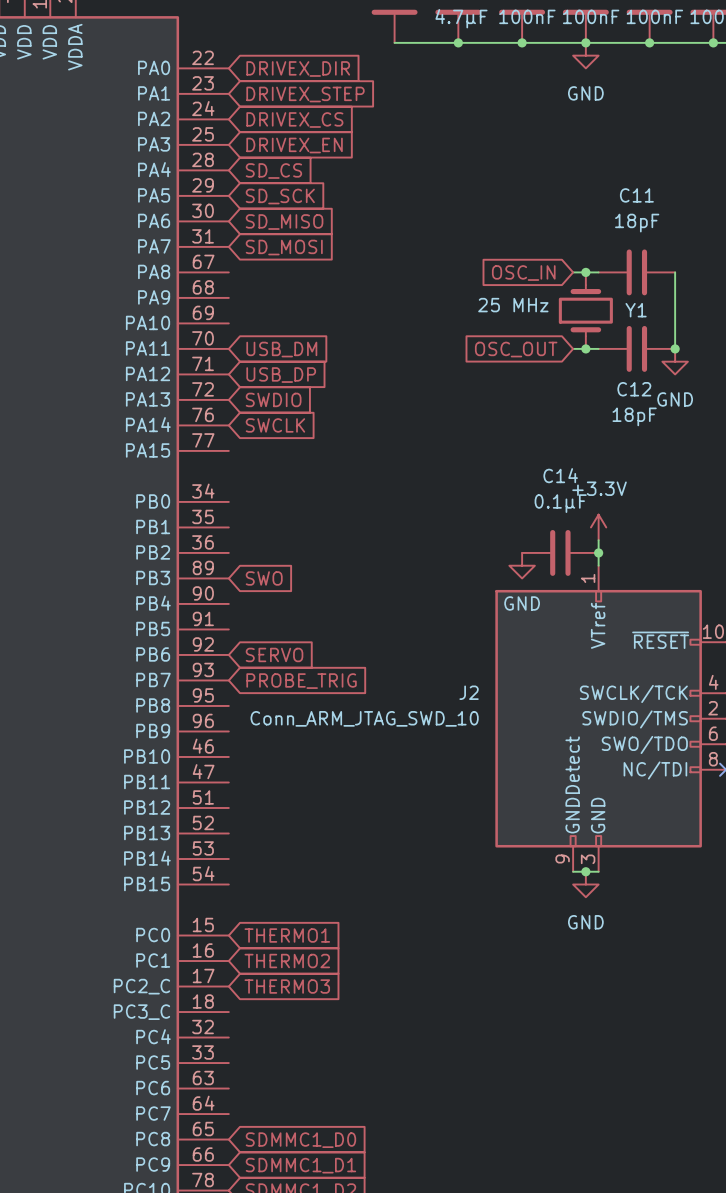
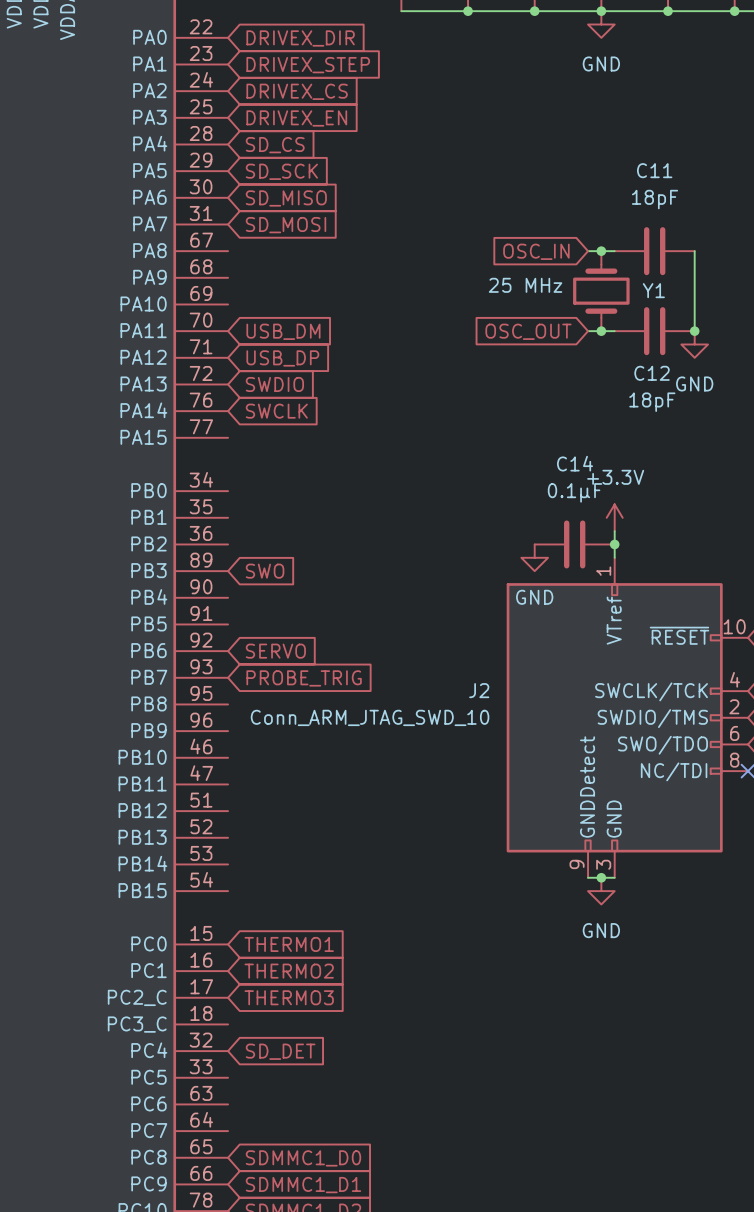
global label: none -> SD_DET (280, 1051)

